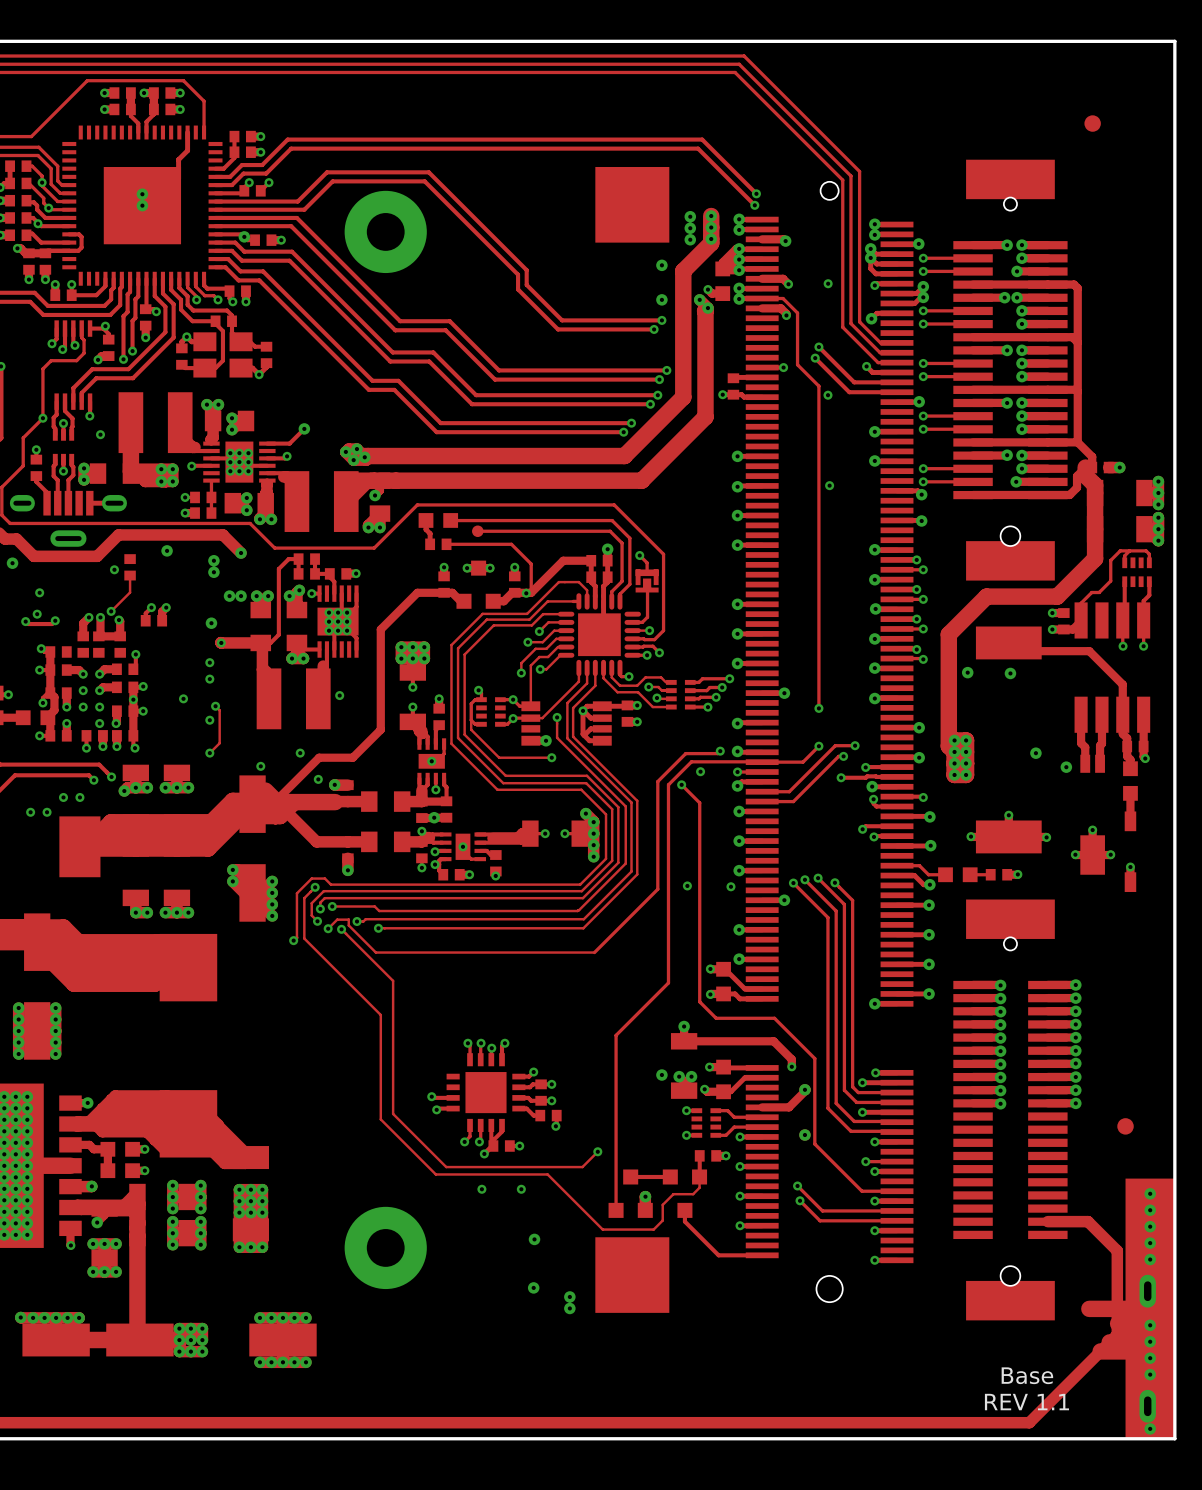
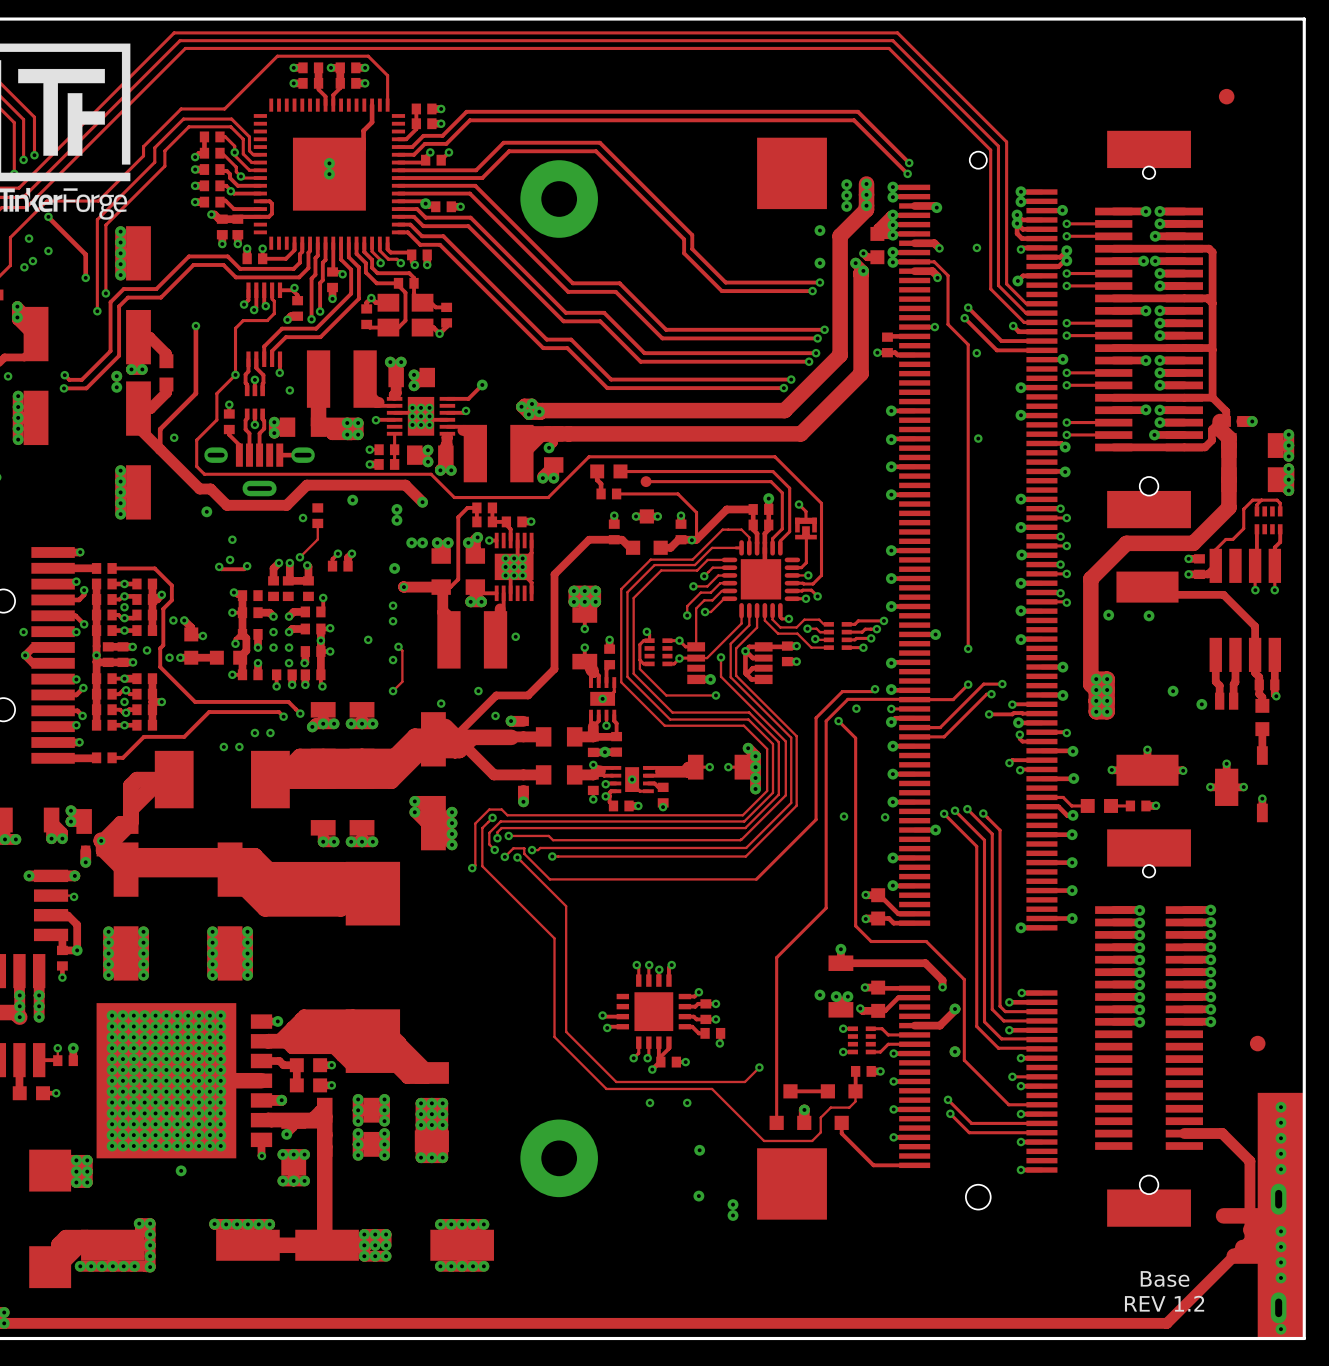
text: REV 1.1 (1026, 1402) -> REV 1.2 (1164, 1303)

